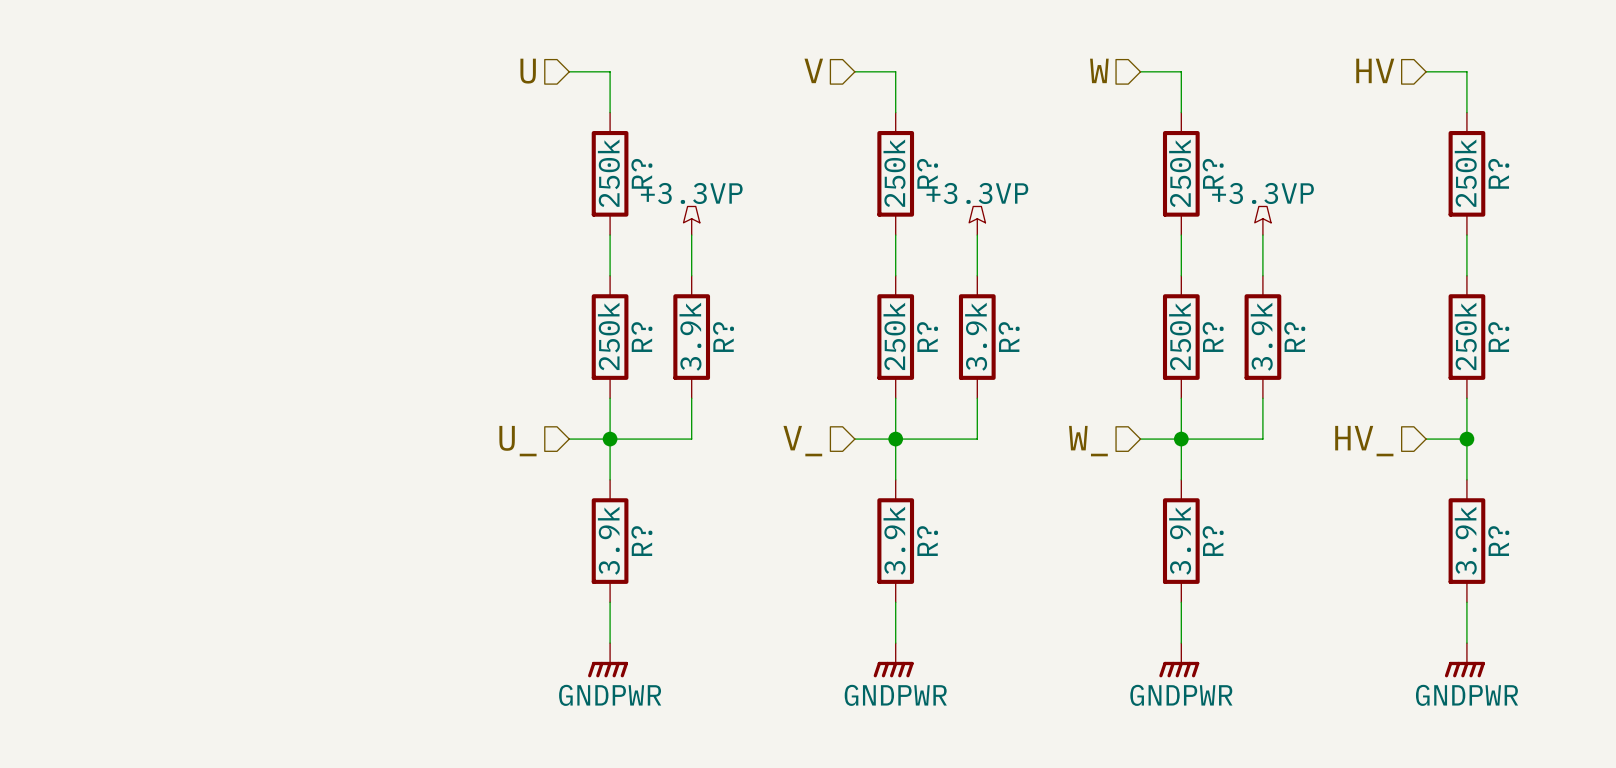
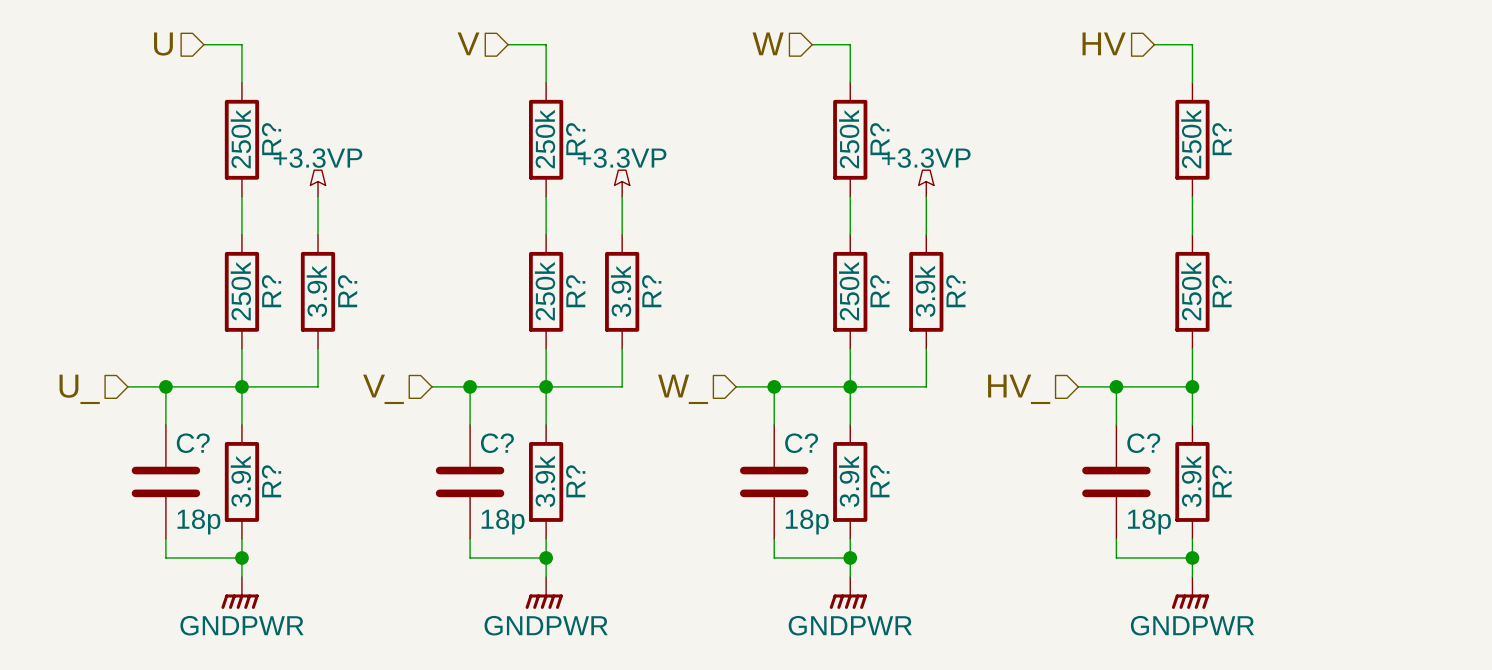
hierarchical label: none -> V (468, 43)
hierarchical label: V (813, 70) -> W (768, 43)
hierarchical label: W (1099, 70) -> none
hierarchical label position: HV (1375, 70) -> HV (1104, 43)
wire: none -> (203, 44) (241, 44) (241, 82)
hierarchical label position: U (528, 71) -> U (163, 44)
wire: (569, 71) (610, 71) (610, 112) -> (508, 44) (546, 44) (546, 82)
wire: (1140, 71) (1181, 71) (1181, 112) -> none
wire: (1426, 71) (1466, 71) (1466, 112) -> (1154, 44) (1192, 44) (1192, 82)
R?: none -> 250k (241, 139)
R? position: (610, 173) -> (546, 139)
R? position: (1181, 173) -> (1192, 139)
R?: 250k (1466, 173) -> none
power symbol: none -> +3.3VP (317, 183)
power symbol position: +3.3VP (691, 220) -> +3.3VP (622, 183)
power symbol: +3.3VP (1262, 220) -> none
wire: none -> (241, 196) (241, 234)
wire: none -> (317, 196) (317, 234)
wire: (610, 235) (610, 275) -> (546, 196) (546, 234)
wire: (691, 235) (691, 275) -> (622, 196) (622, 234)
wire: (1181, 235) (1181, 275) -> (1192, 386) (1192, 424)
wire: (1466, 235) (1466, 275) -> none
R? value: 3.9k (1261, 336) -> 250k (1191, 291)
R?: none -> 250k (241, 291)
R?: none -> 3.9k (317, 291)
R? position: (610, 337) -> (546, 291)
R? position: (691, 337) -> (622, 291)
R?: 250k (1181, 337) -> none
R?: 250k (1466, 337) -> none
wire: none -> (241, 348) (241, 424)
wire: none -> (317, 348) (317, 386) (127, 386)
wire: (610, 398) (610, 479) -> (546, 348) (546, 424)
wire: (691, 398) (691, 439) (650, 439) -> (622, 348) (622, 386)
wire: (1181, 398) (1181, 439) -> (774, 386) (774, 424)
wire: (1466, 398) (1466, 479) -> none
wire: none -> (165, 386) (165, 424)
junction: none -> (165, 386)
junction: none -> (241, 386)
wire: none -> (432, 386) (546, 386)
wire: none -> (470, 386) (470, 424)
junction: none -> (470, 386)
junction position: (610, 439) -> (546, 386)
wire: none -> (736, 386) (812, 386)
junction: none -> (774, 386)
junction: none -> (1192, 386)
wire: (1426, 439) (1466, 439) -> none
junction: (1466, 439) -> none
hierarchical label: none -> U_ (79, 389)
hierarchical label: none -> V_ (383, 389)
hierarchical label: U_ (517, 441) -> none
hierarchical label: none -> W_ (683, 389)
hierarchical label: V_ (802, 441) -> none
hierarchical label: W_ (1088, 441) -> HV_ (1019, 389)
hierarchical label: HV_ (1364, 441) -> none
C?: none -> 18p (165, 481)
R?: none -> 3.9k (241, 481)
C?: none -> 18p (470, 481)
R? position: (610, 541) -> (546, 481)
C?: none -> 18p (774, 481)
R? position: (1181, 541) -> (1192, 481)
C?: none -> 18p (1116, 481)
R?: 3.9k (1466, 541) -> none
wire: none -> (165, 538) (165, 557) (241, 557)
wire: none -> (241, 538) (241, 576)
wire: none -> (470, 538) (470, 557) (546, 557)
wire: (610, 602) (610, 643) -> (546, 538) (546, 576)
wire: none -> (774, 538) (774, 557) (850, 557)
wire: (1466, 602) (1466, 643) -> (1192, 538) (1192, 576)
junction: none -> (241, 557)
junction: none -> (546, 557)
junction: none -> (850, 557)
wire: (1181, 622) (1181, 643) -> (1116, 557) (1192, 557)
junction: none -> (1192, 557)
power symbol: none -> GNDPWR (240, 592)
power symbol position: GNDPWR (608, 660) -> GNDPWR (544, 592)
power symbol position: GNDPWR (1179, 660) -> GNDPWR (1190, 592)
power symbol: GNDPWR (1464, 660) -> none

